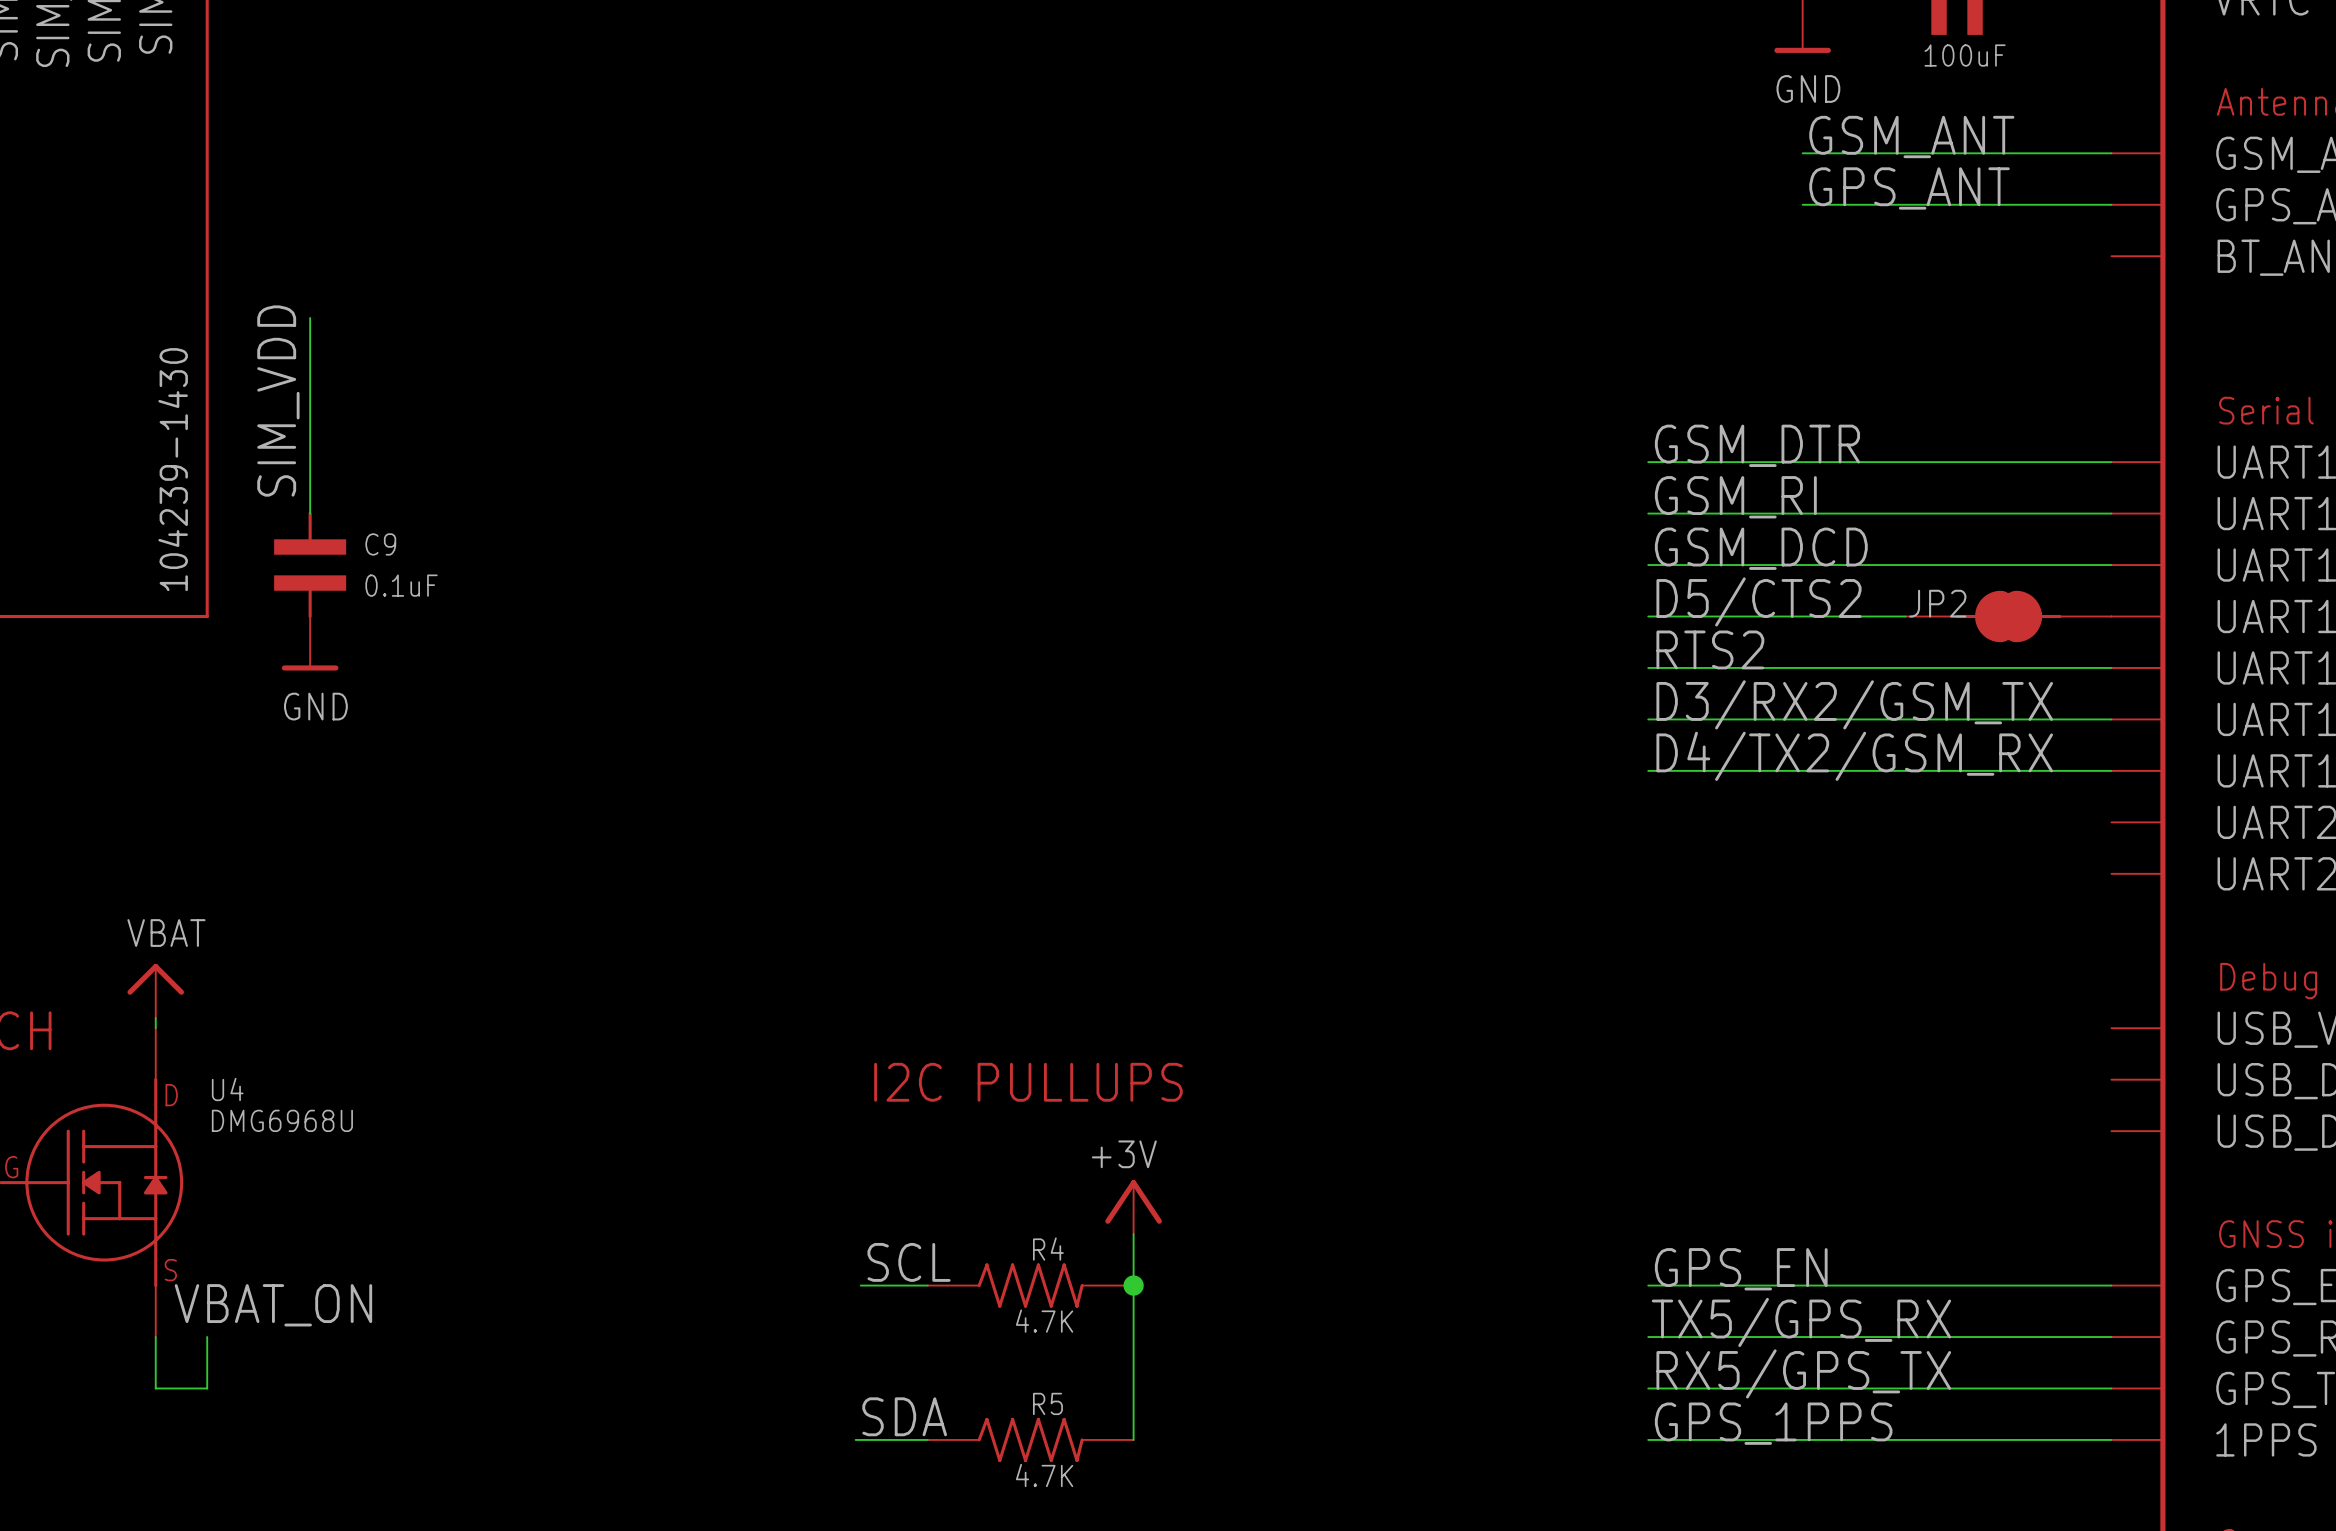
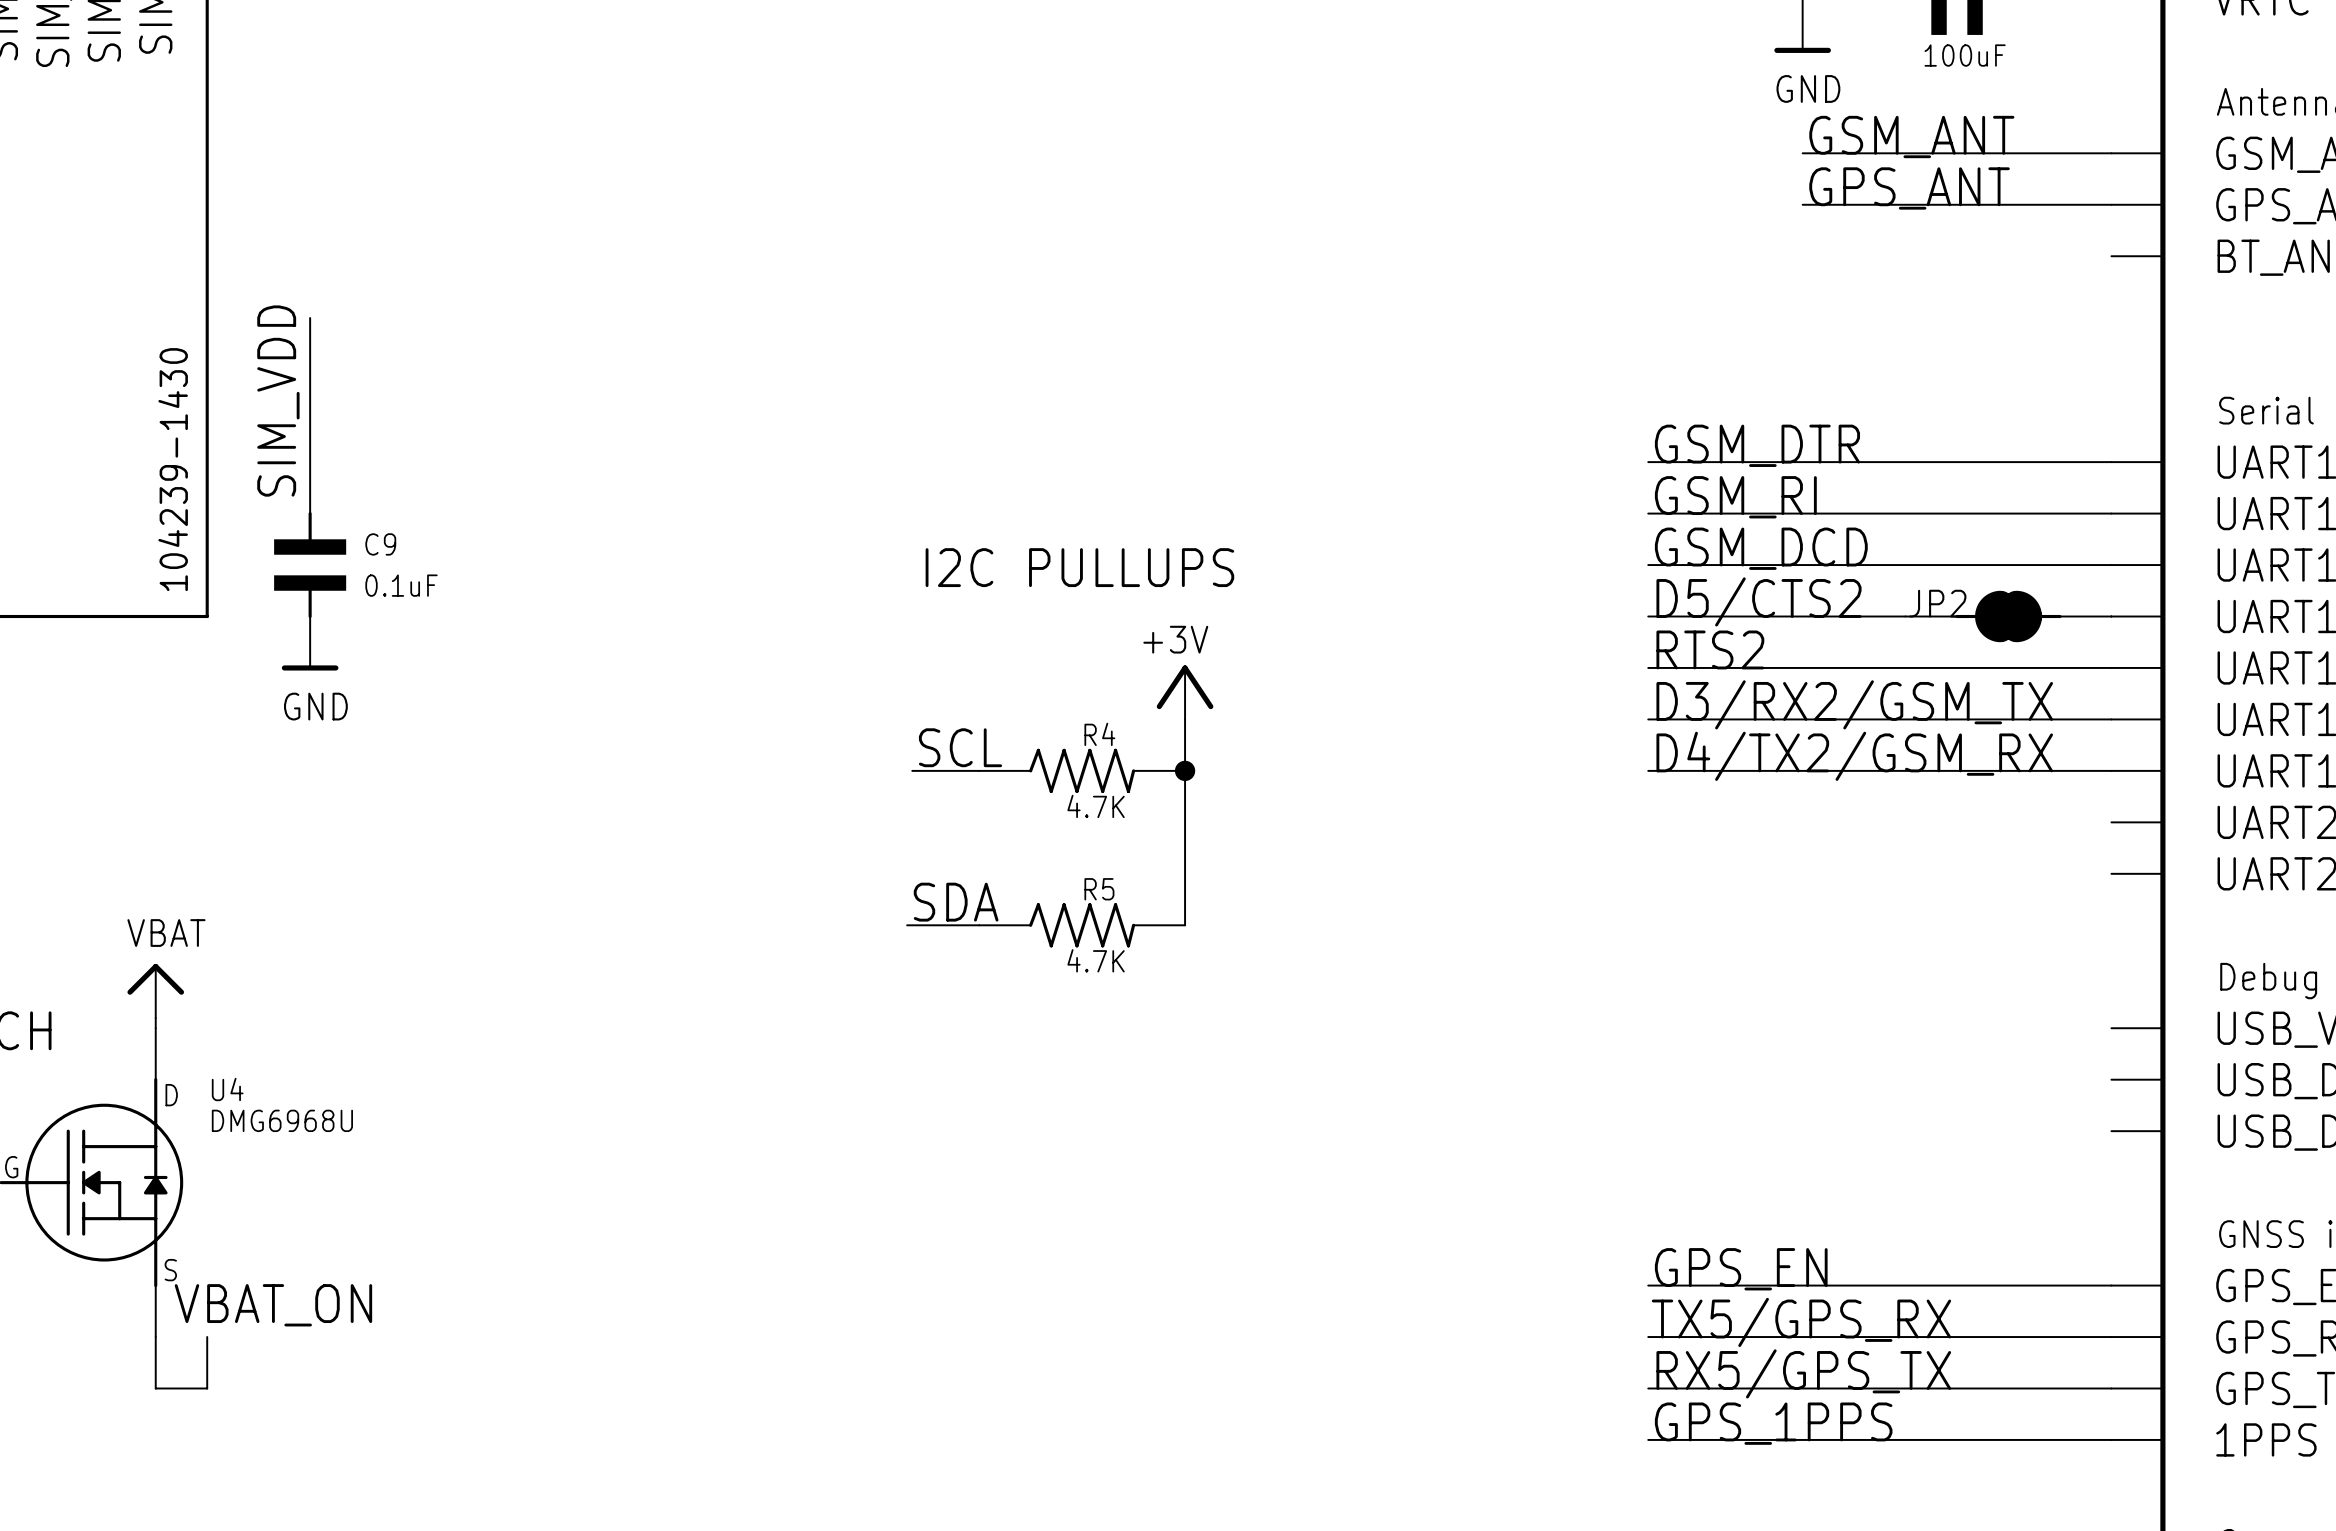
text: none -> I2C PULLUPS (1079, 567)
power symbol: none -> +3V (1185, 692)
wire: none -> (1185, 719) (1185, 925)
label: none -> SCL (960, 747)
wire: none -> (912, 770) (979, 770)
junction: none -> (1185, 770)
label: none -> SDA (956, 902)
wire: none -> (907, 925) (979, 925)
text: I2C PULLUPS (1028, 1082) -> none
power symbol: +3V (1133, 1207) -> none
wire: (1133, 1234) (1133, 1439) -> none
label: SCL (909, 1262) -> none
wire: (860, 1285) (927, 1285) -> none
R4 position: (1030, 1285) -> (1082, 770)
junction: (1133, 1285) -> none
label: SDA (904, 1416) -> none
wire: (855, 1439) (927, 1439) -> none
R5 position: (1030, 1439) -> (1082, 925)

